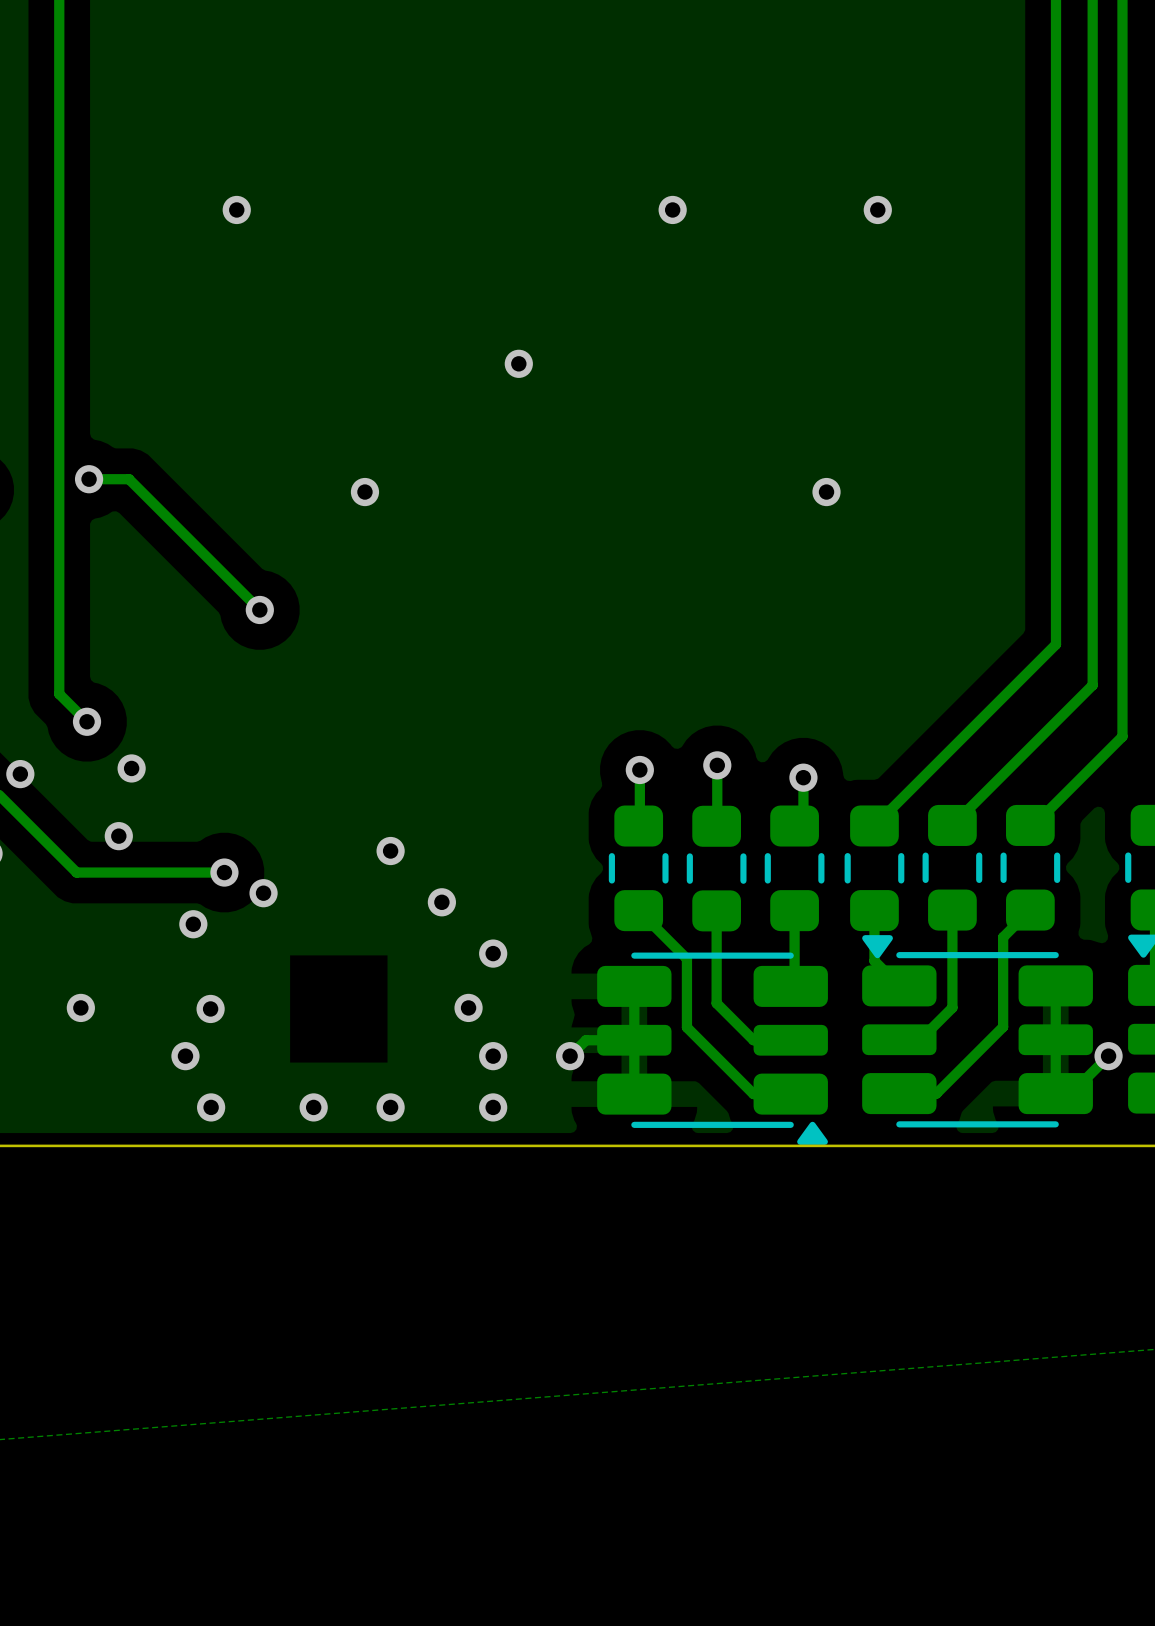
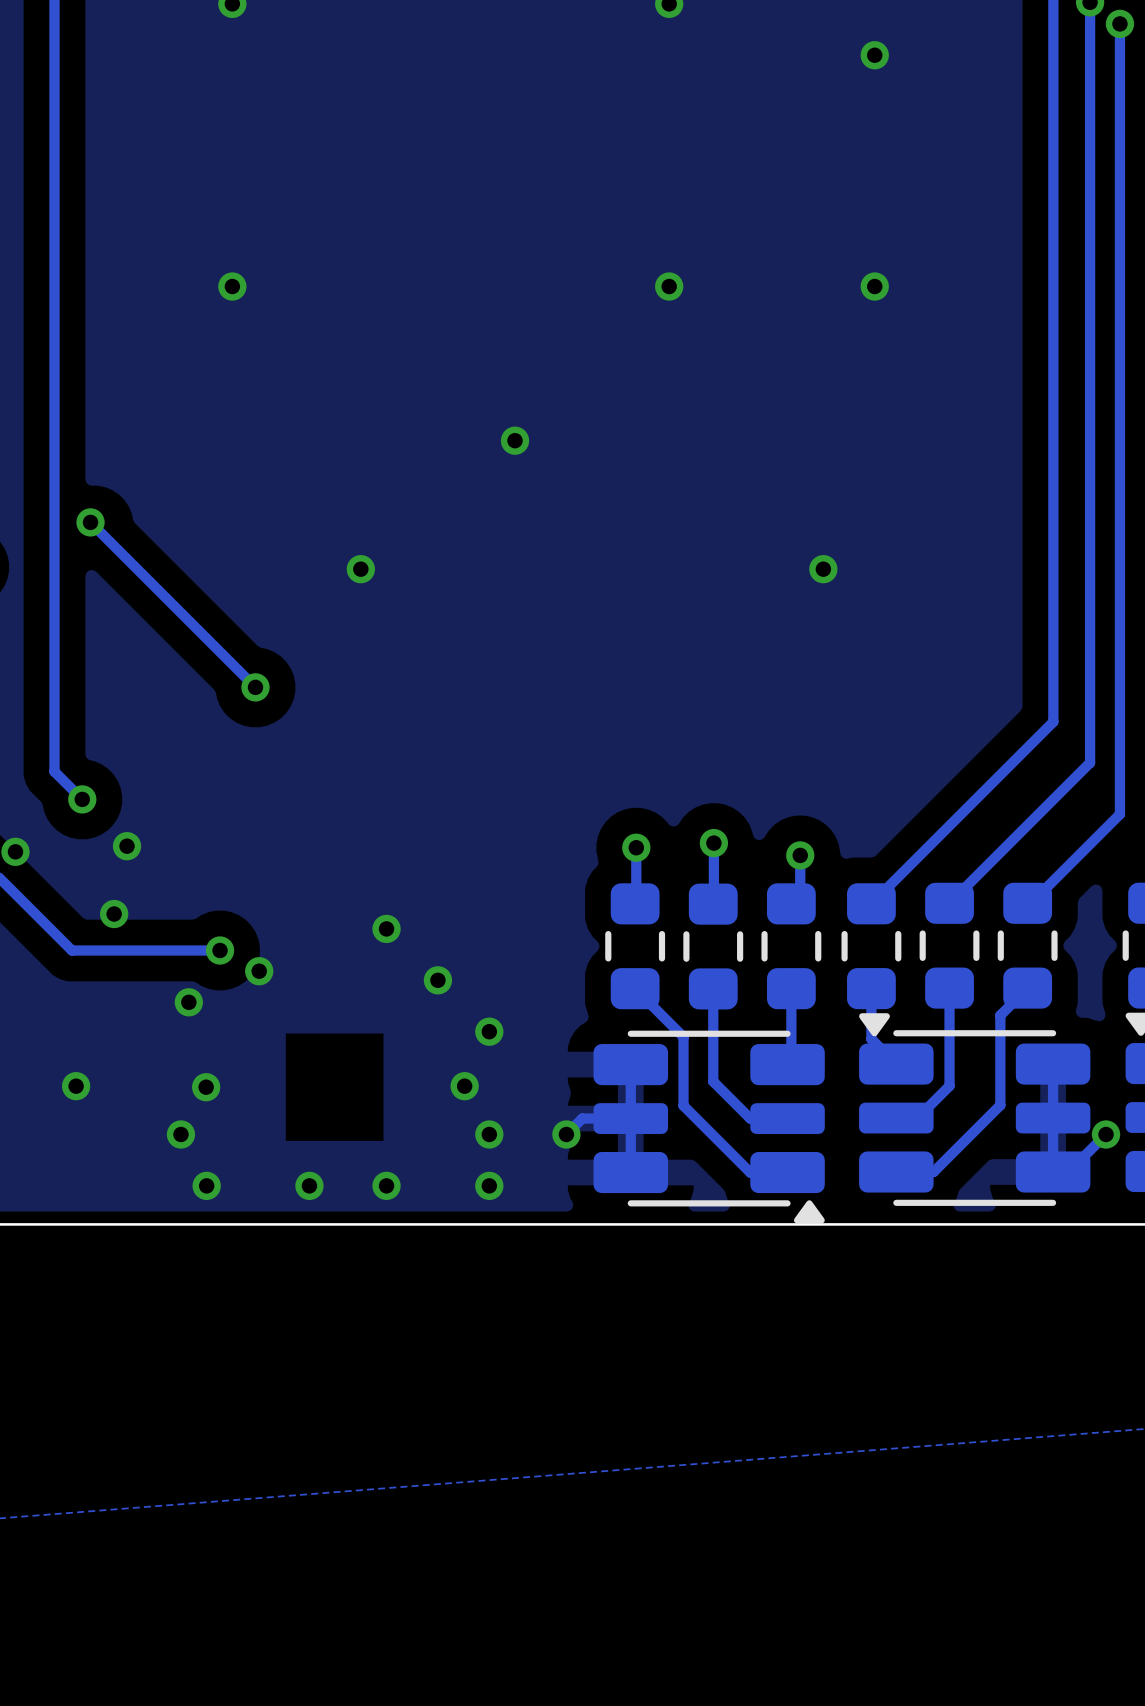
via position: (89, 479) -> (90, 522)
track: (129, 479) (89, 479) -> (124, 556) (90, 522)

